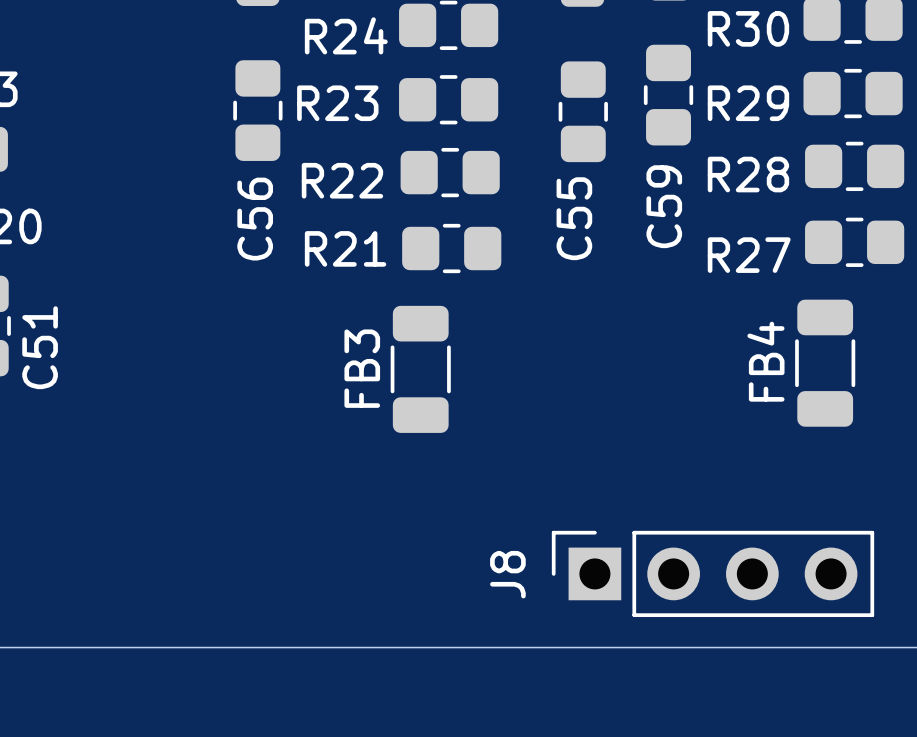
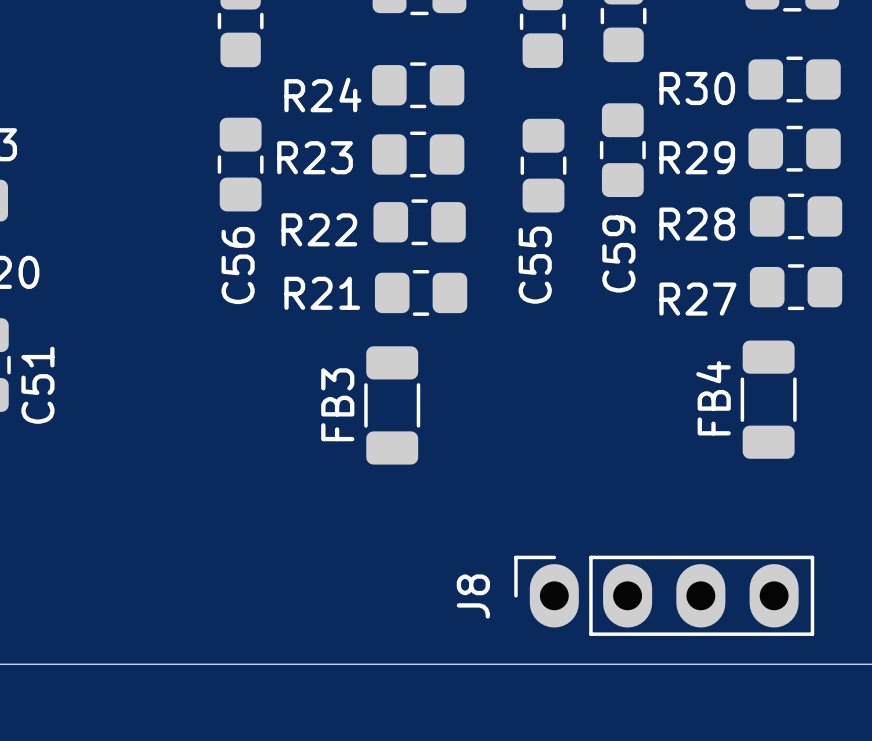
J8 footprint: [551, 530, 875, 618] -> [514, 555, 815, 636]

